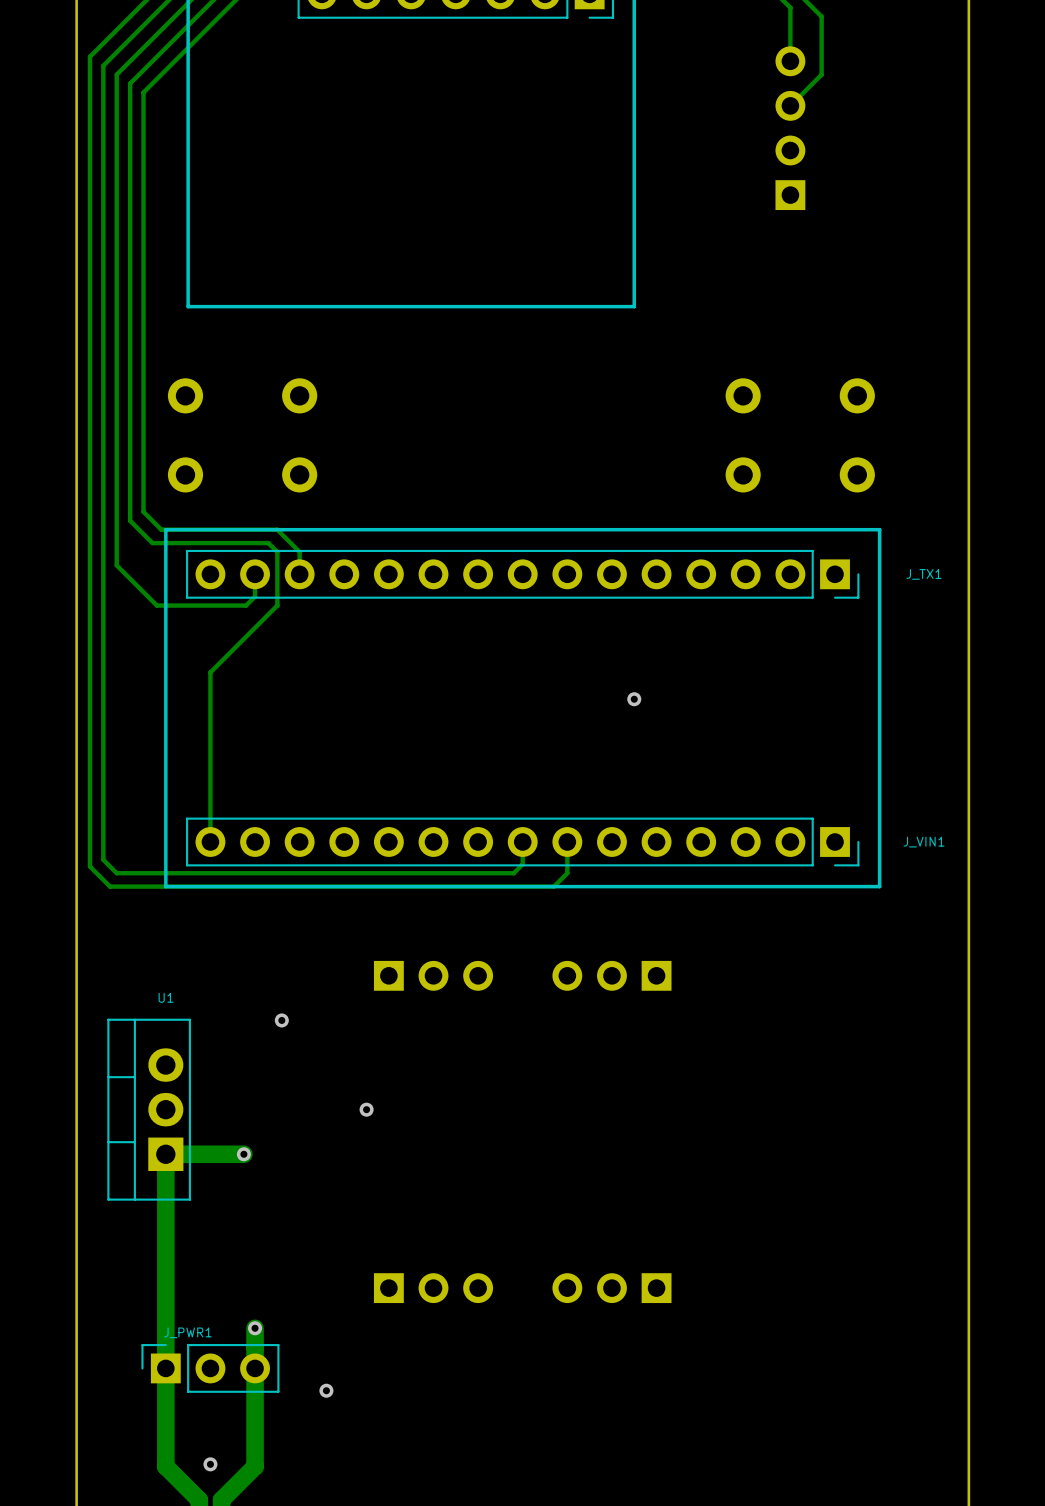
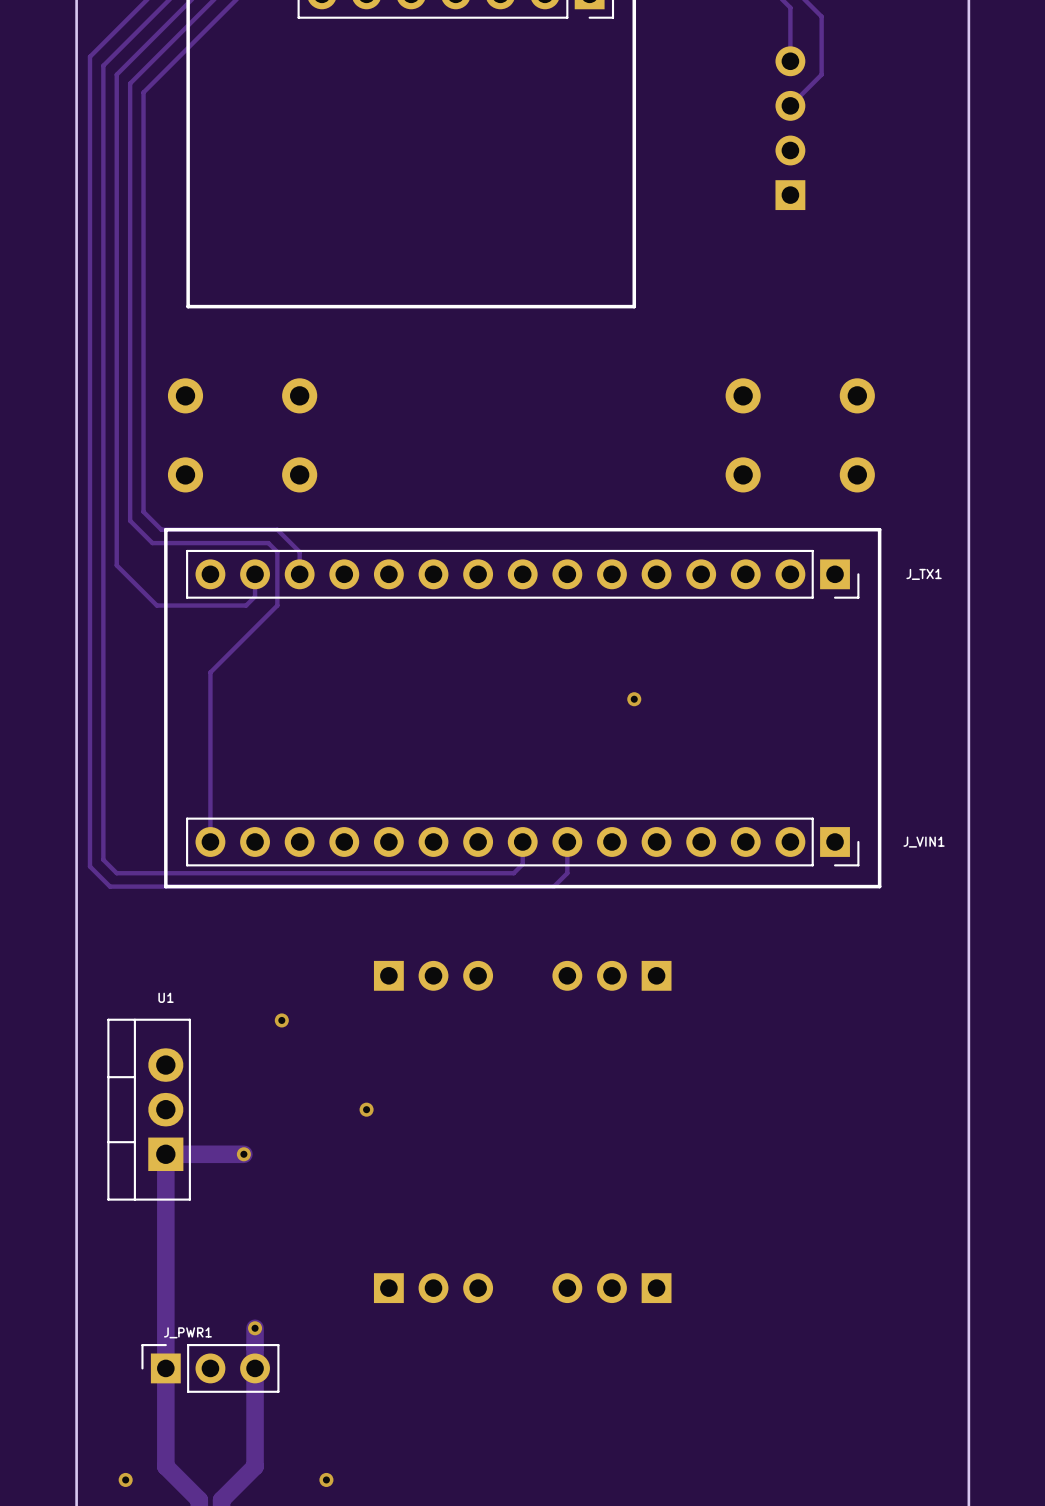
via: (326, 1390) -> none
via: (210, 1464) -> none
via: none -> (125, 1479)
via: none -> (326, 1479)

